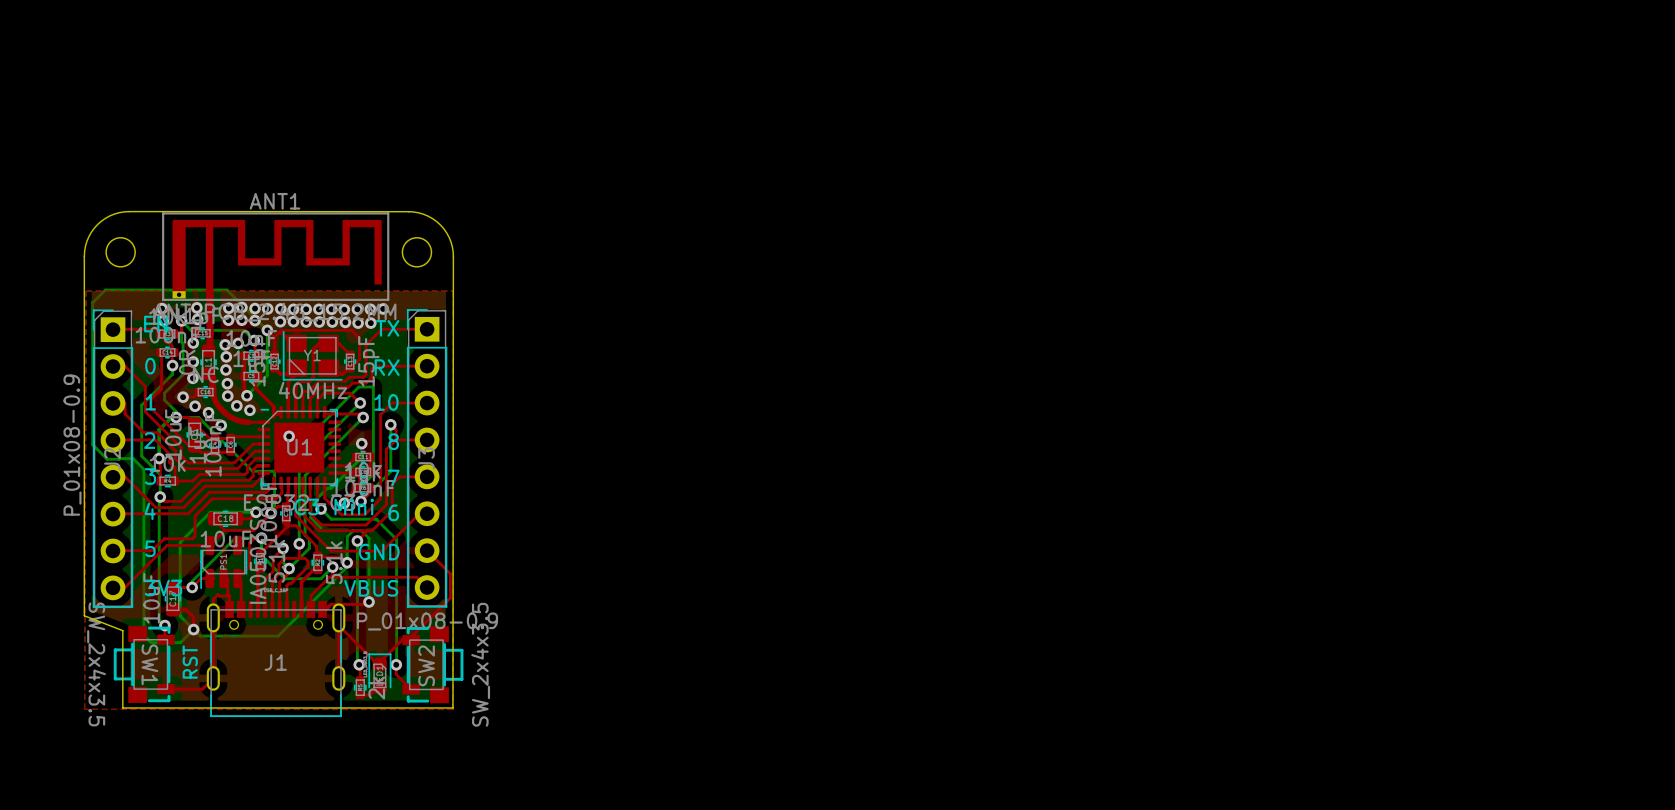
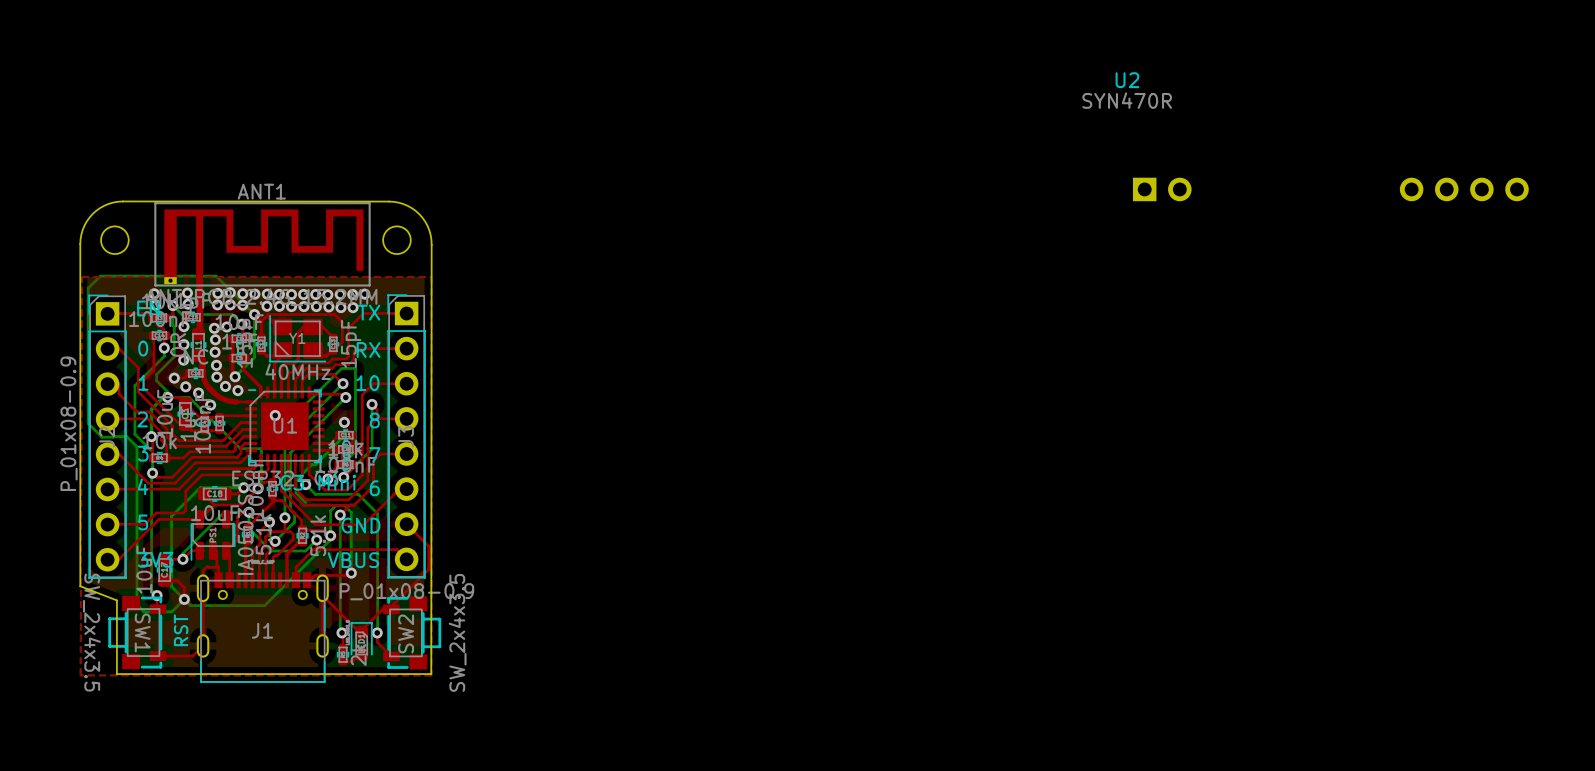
U2: none -> SYN470R (1330, 189)

